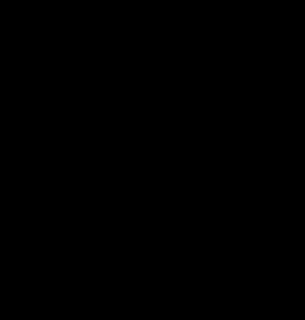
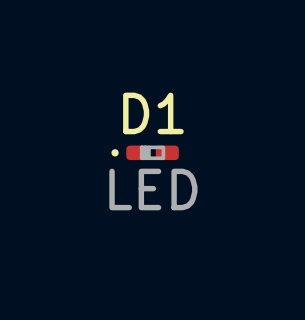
D1: none -> LED (145, 152)

